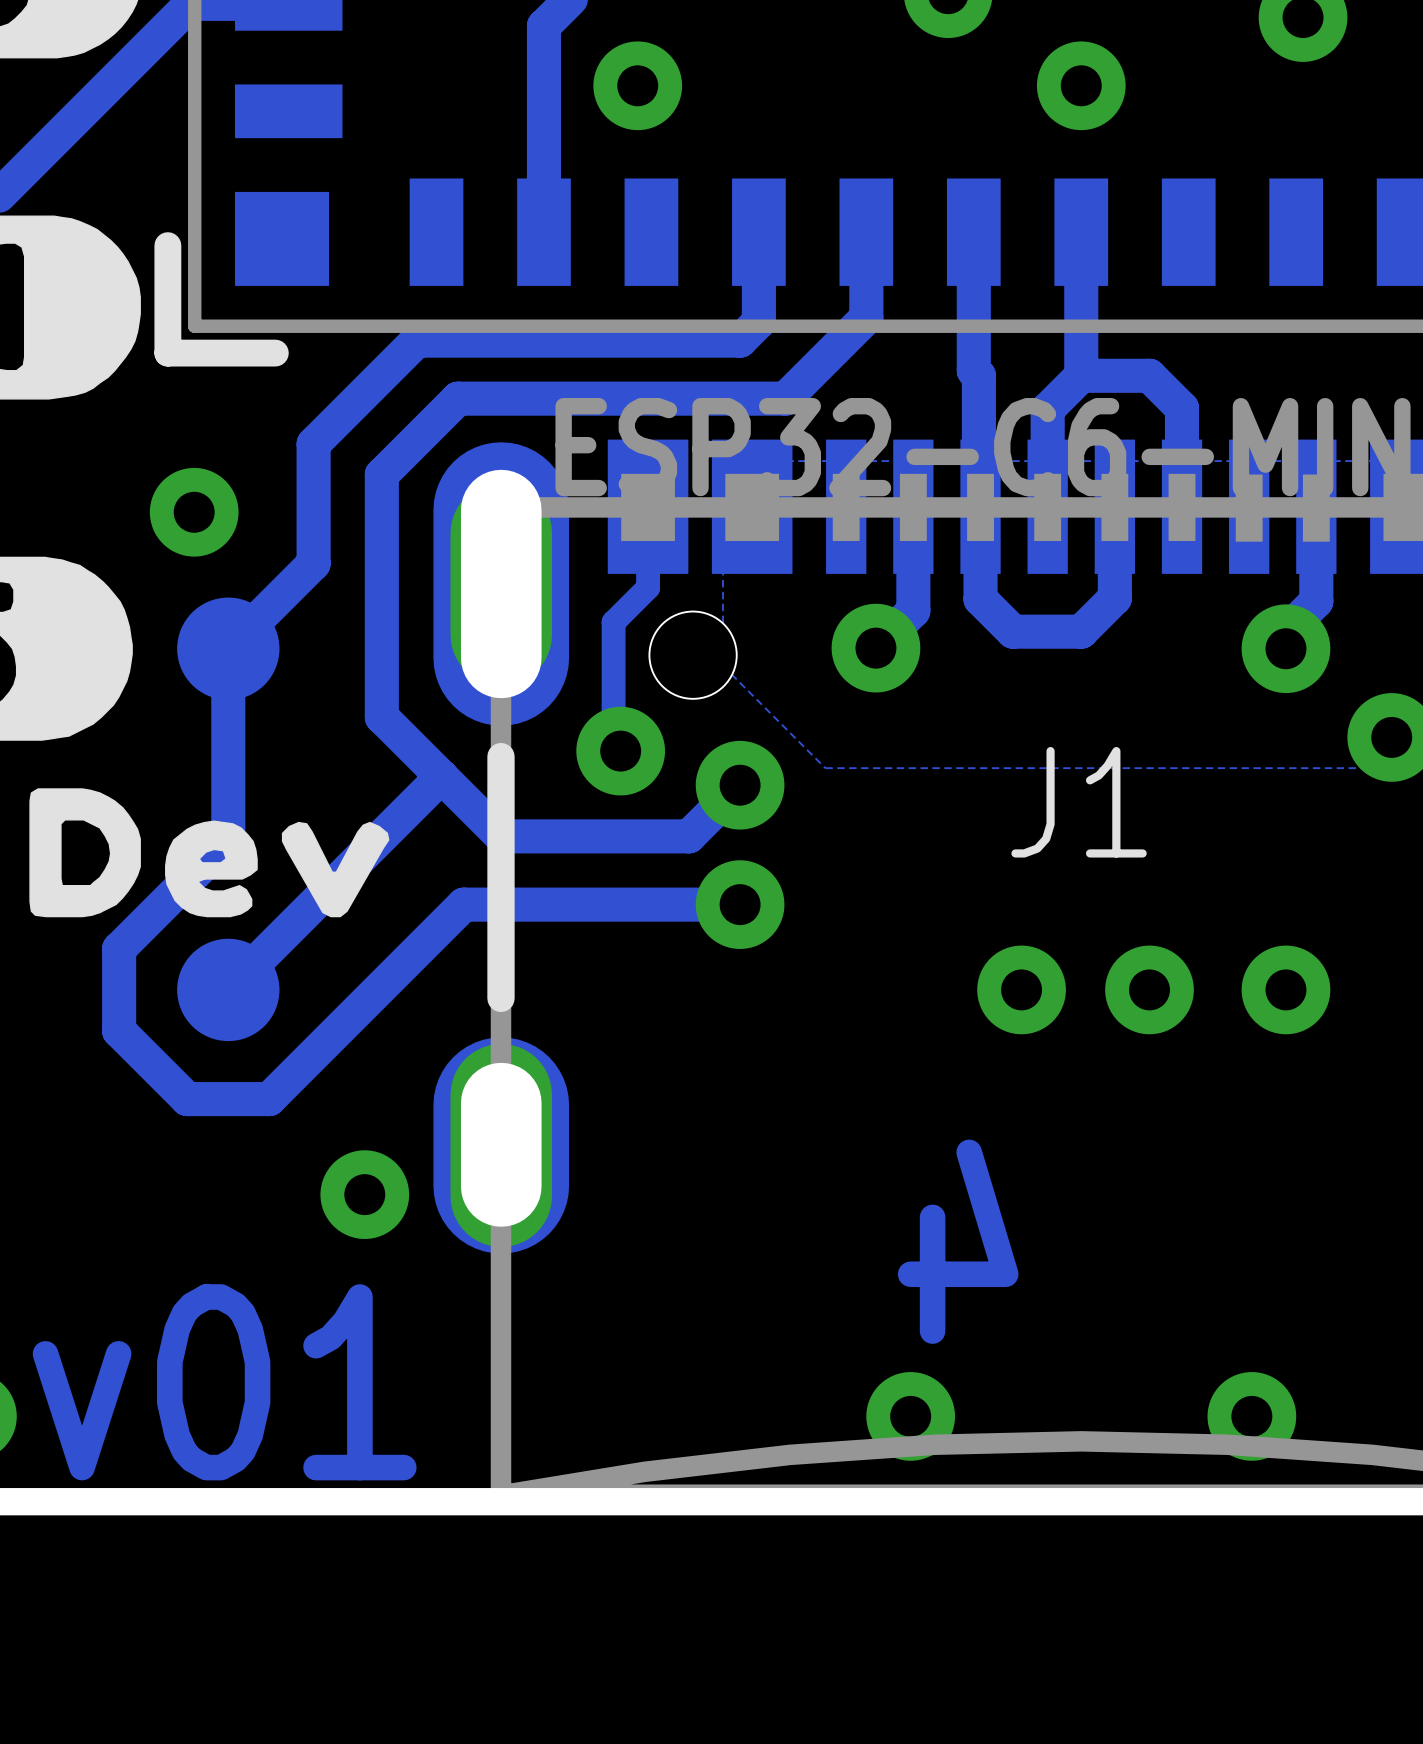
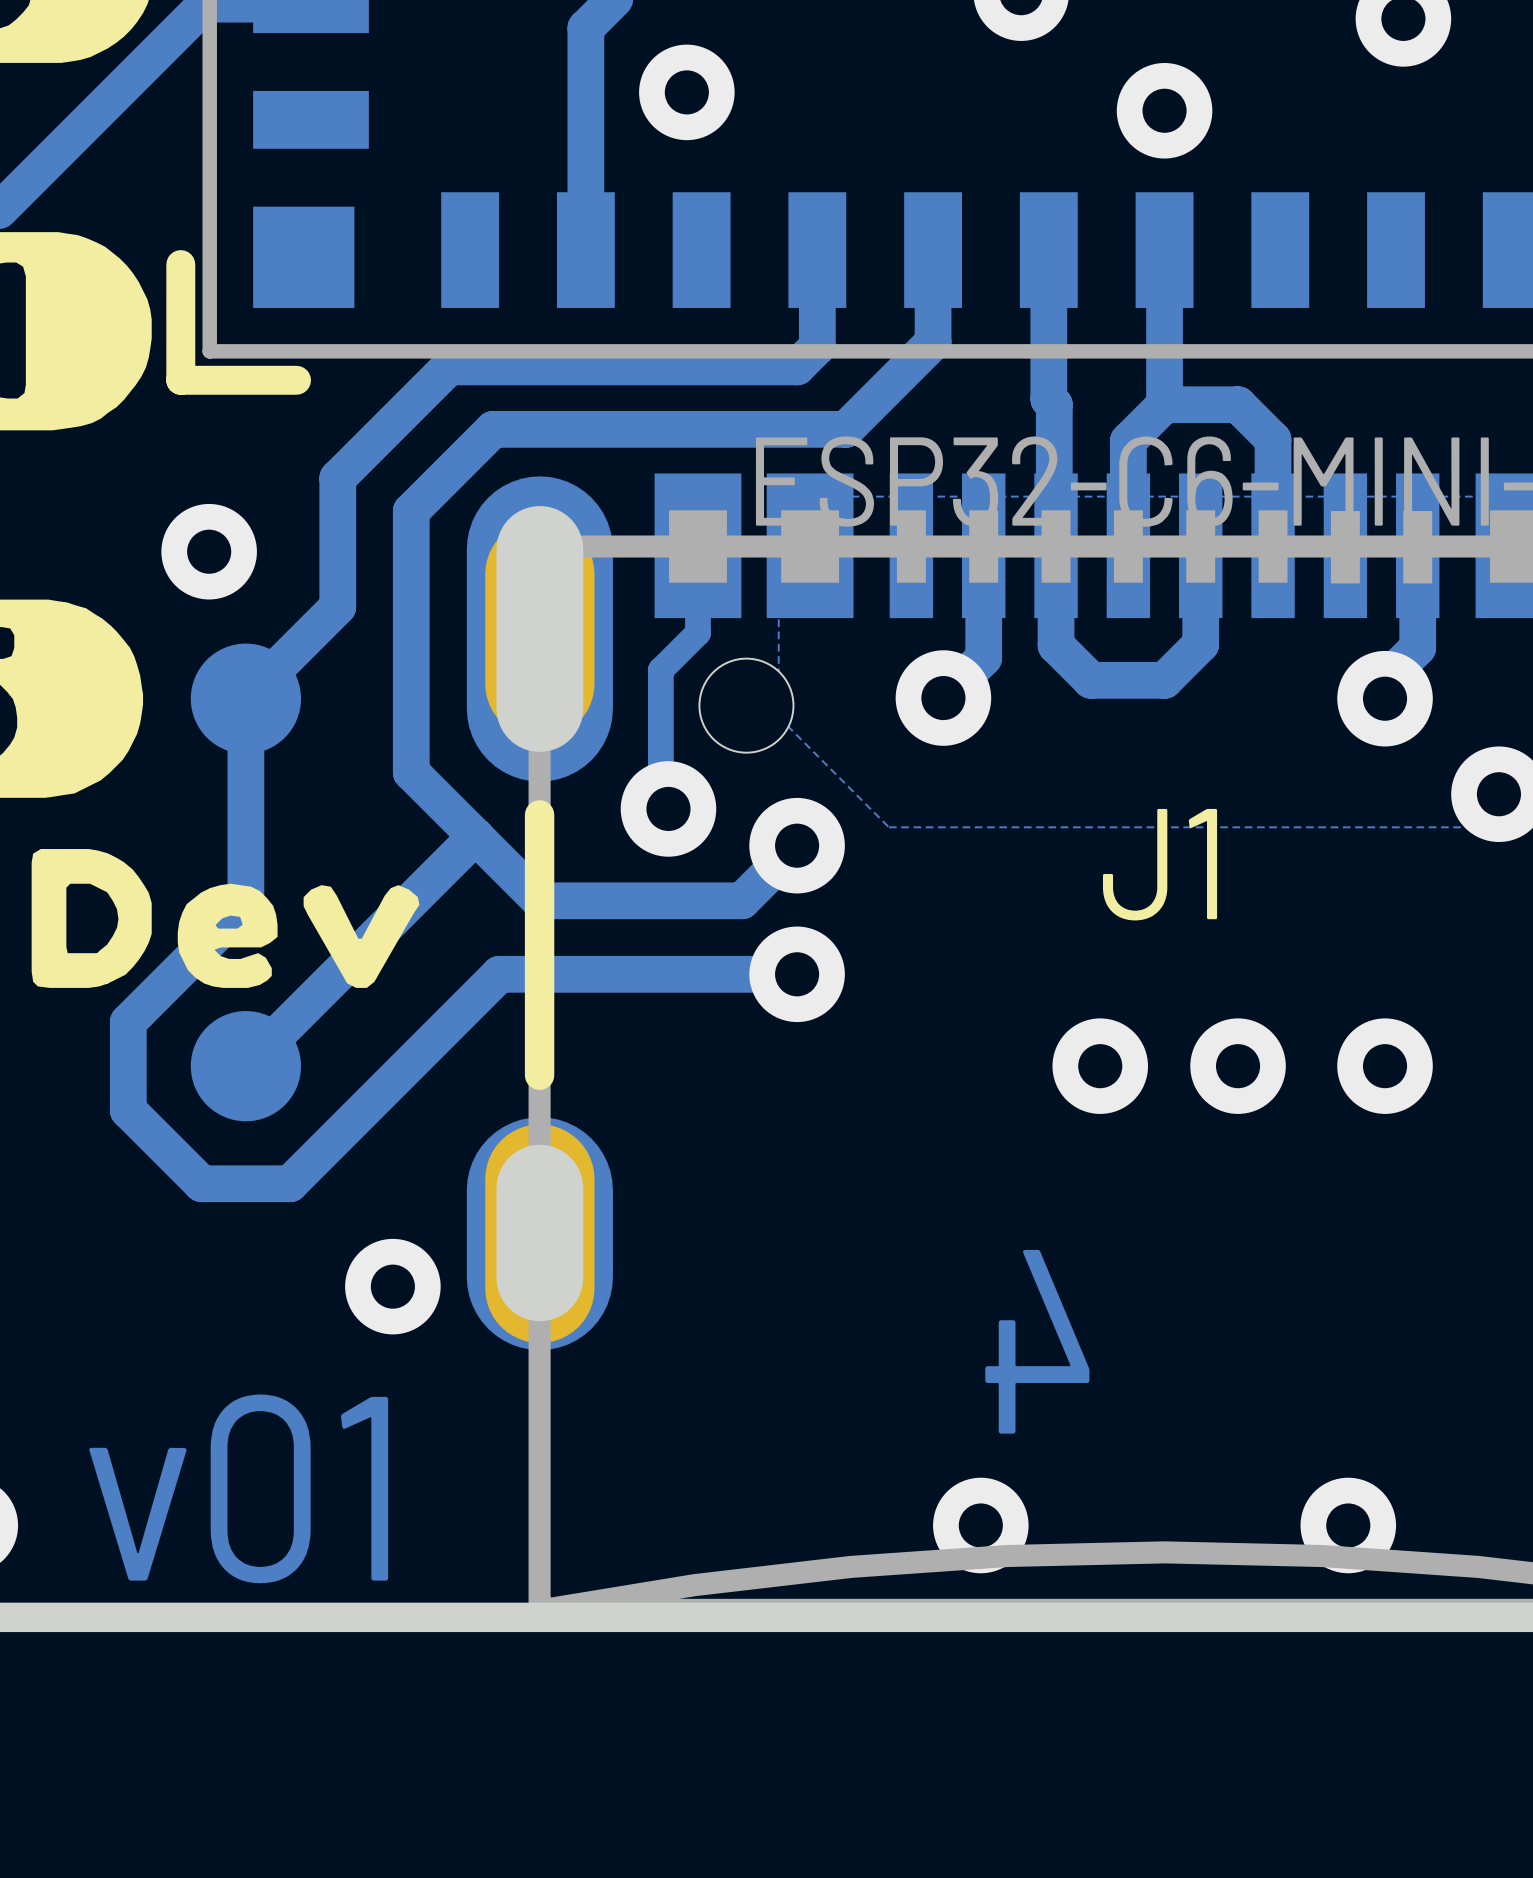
via position: (1081, 85) -> (1164, 110)

